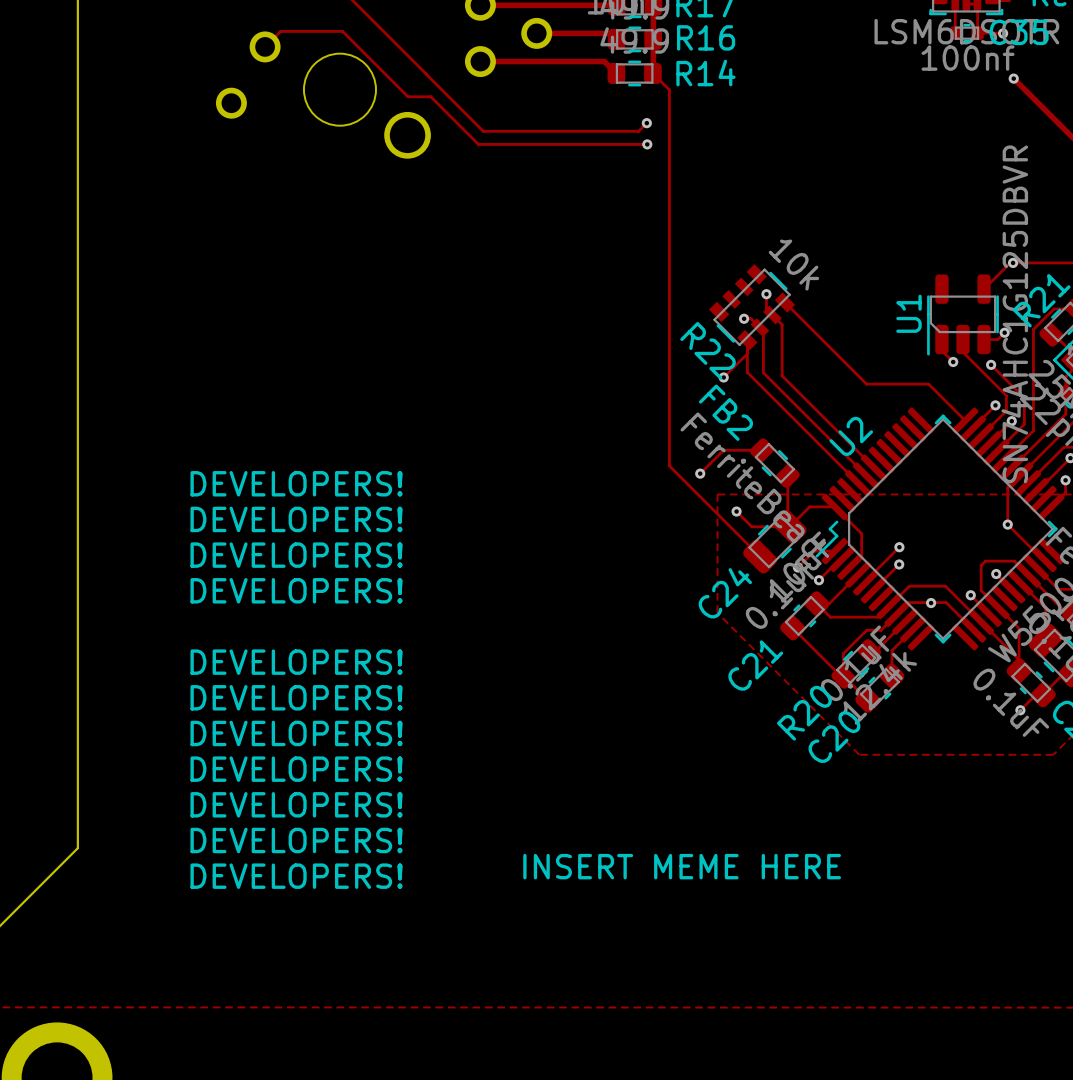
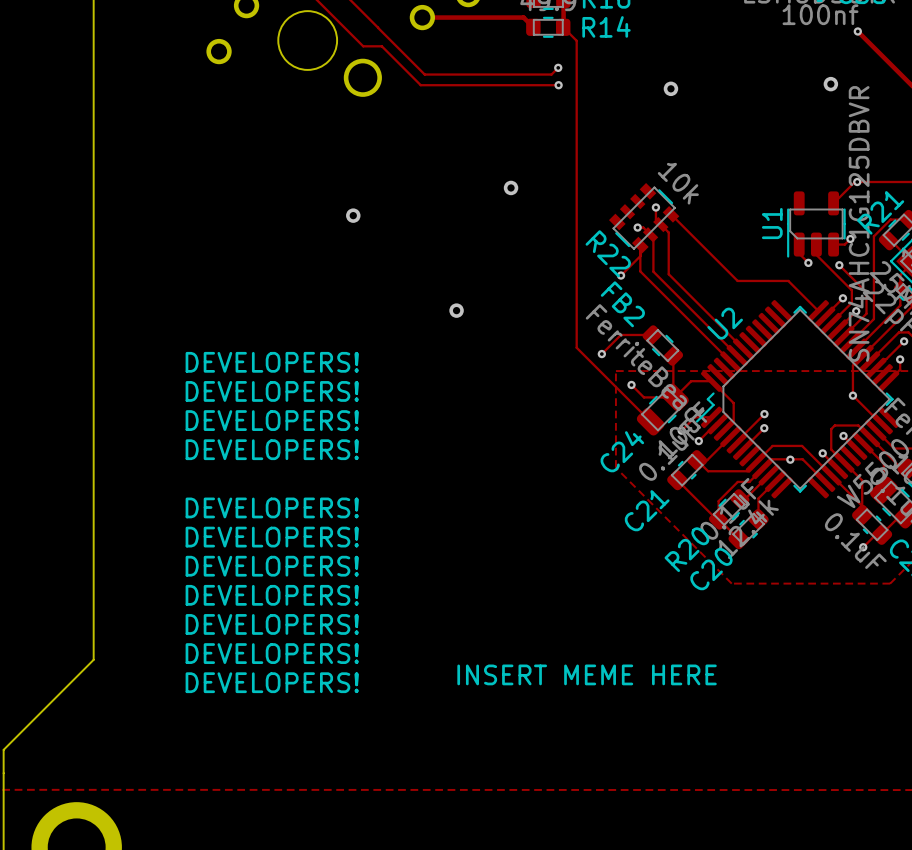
via: none -> (830, 84)
via: none -> (670, 88)
via: none -> (511, 187)
via: none -> (353, 215)
via: none -> (456, 310)

